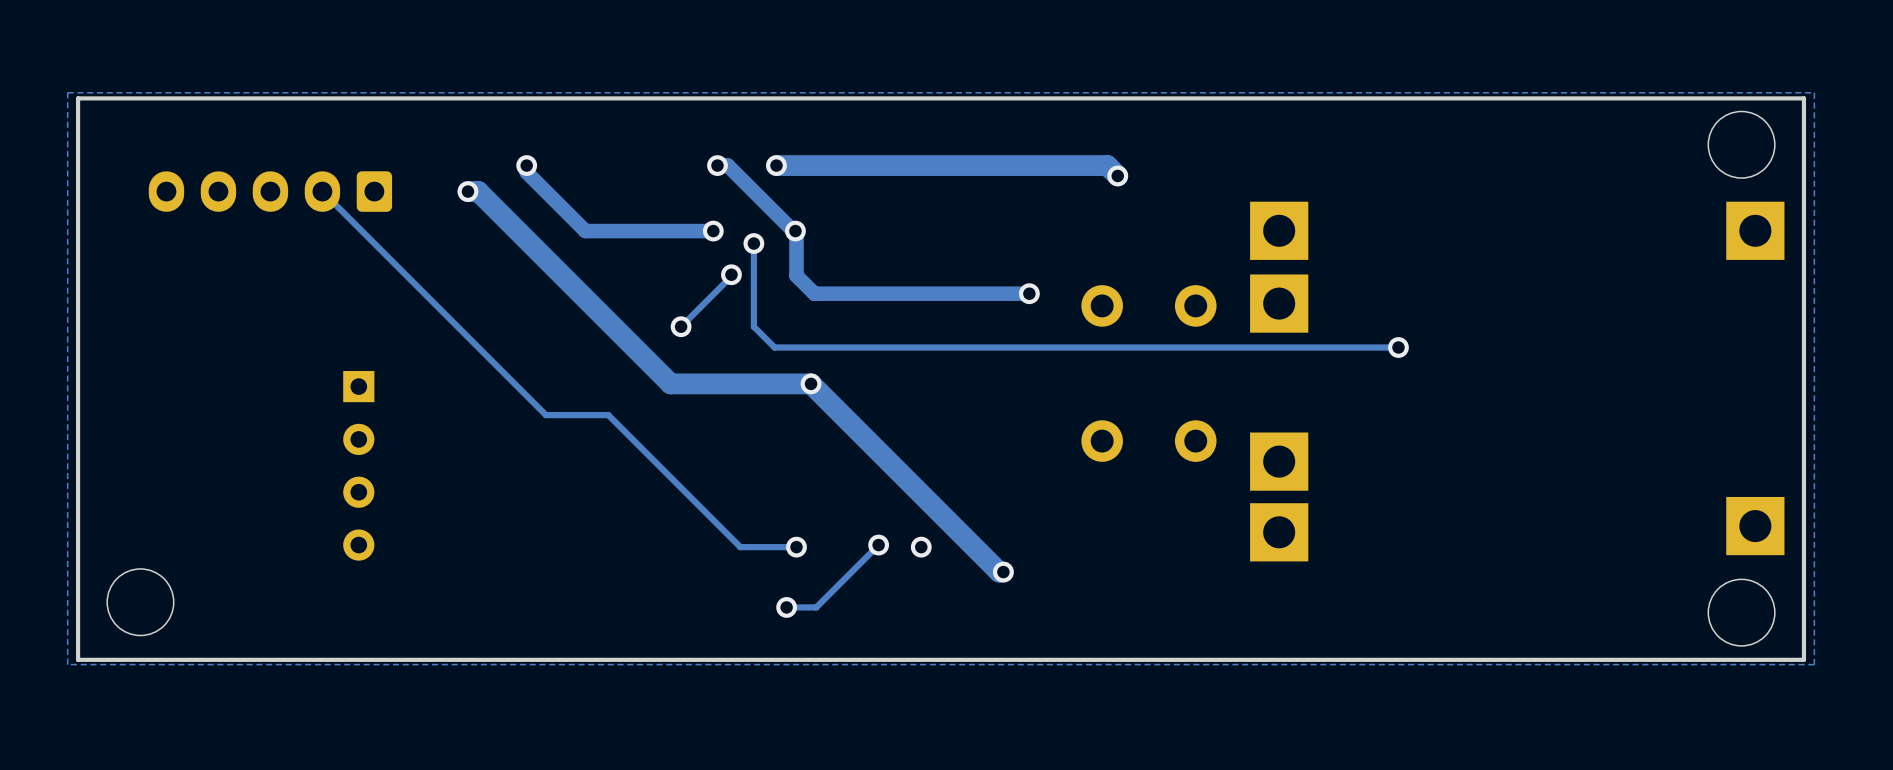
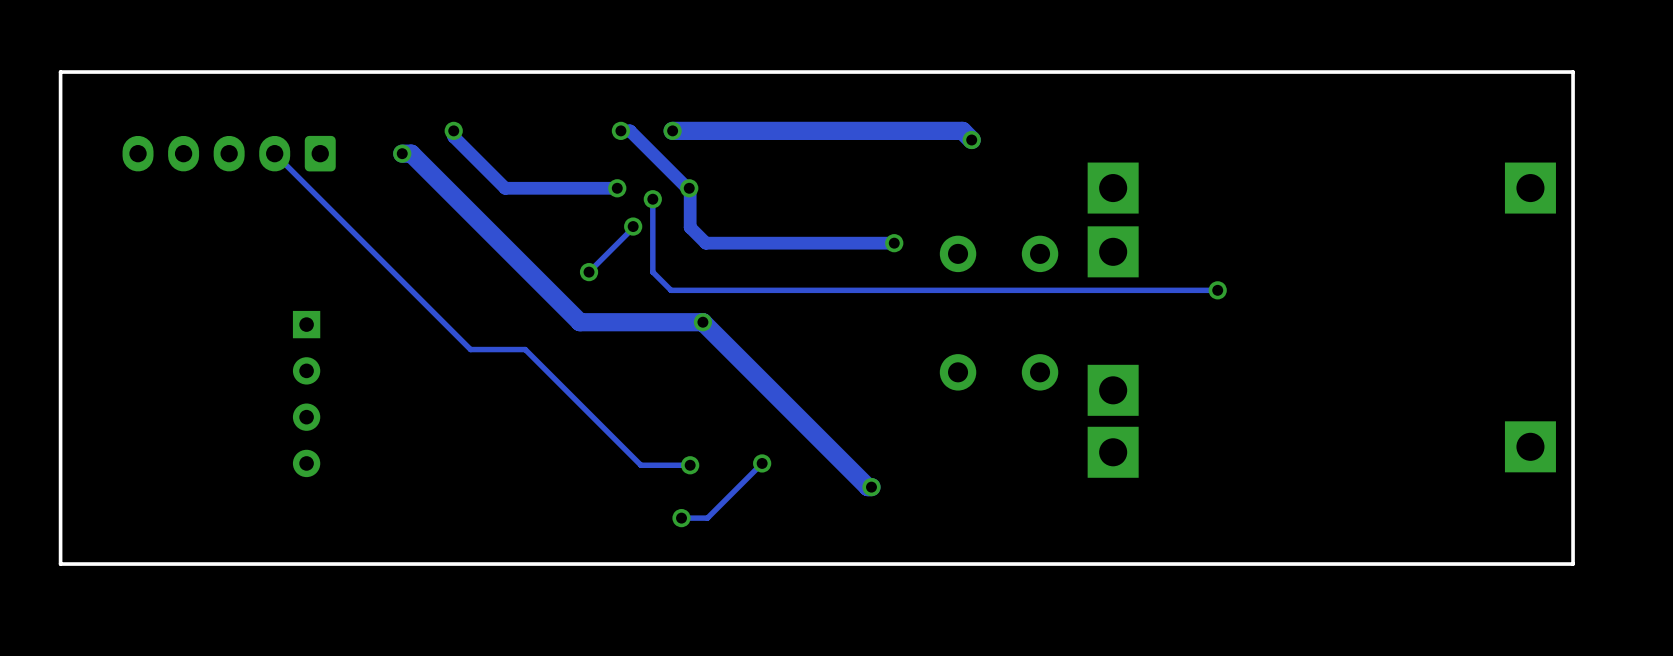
zone outline: (1814, 92) (1814, 664) (67, 664) (67, 92) (1814, 92) -> none
round board edge: [1707, 110, 1776, 179] -> none
via: (921, 547) -> none
round board edge: [106, 568, 175, 637] -> none
round board edge: [1707, 578, 1776, 647] -> none

